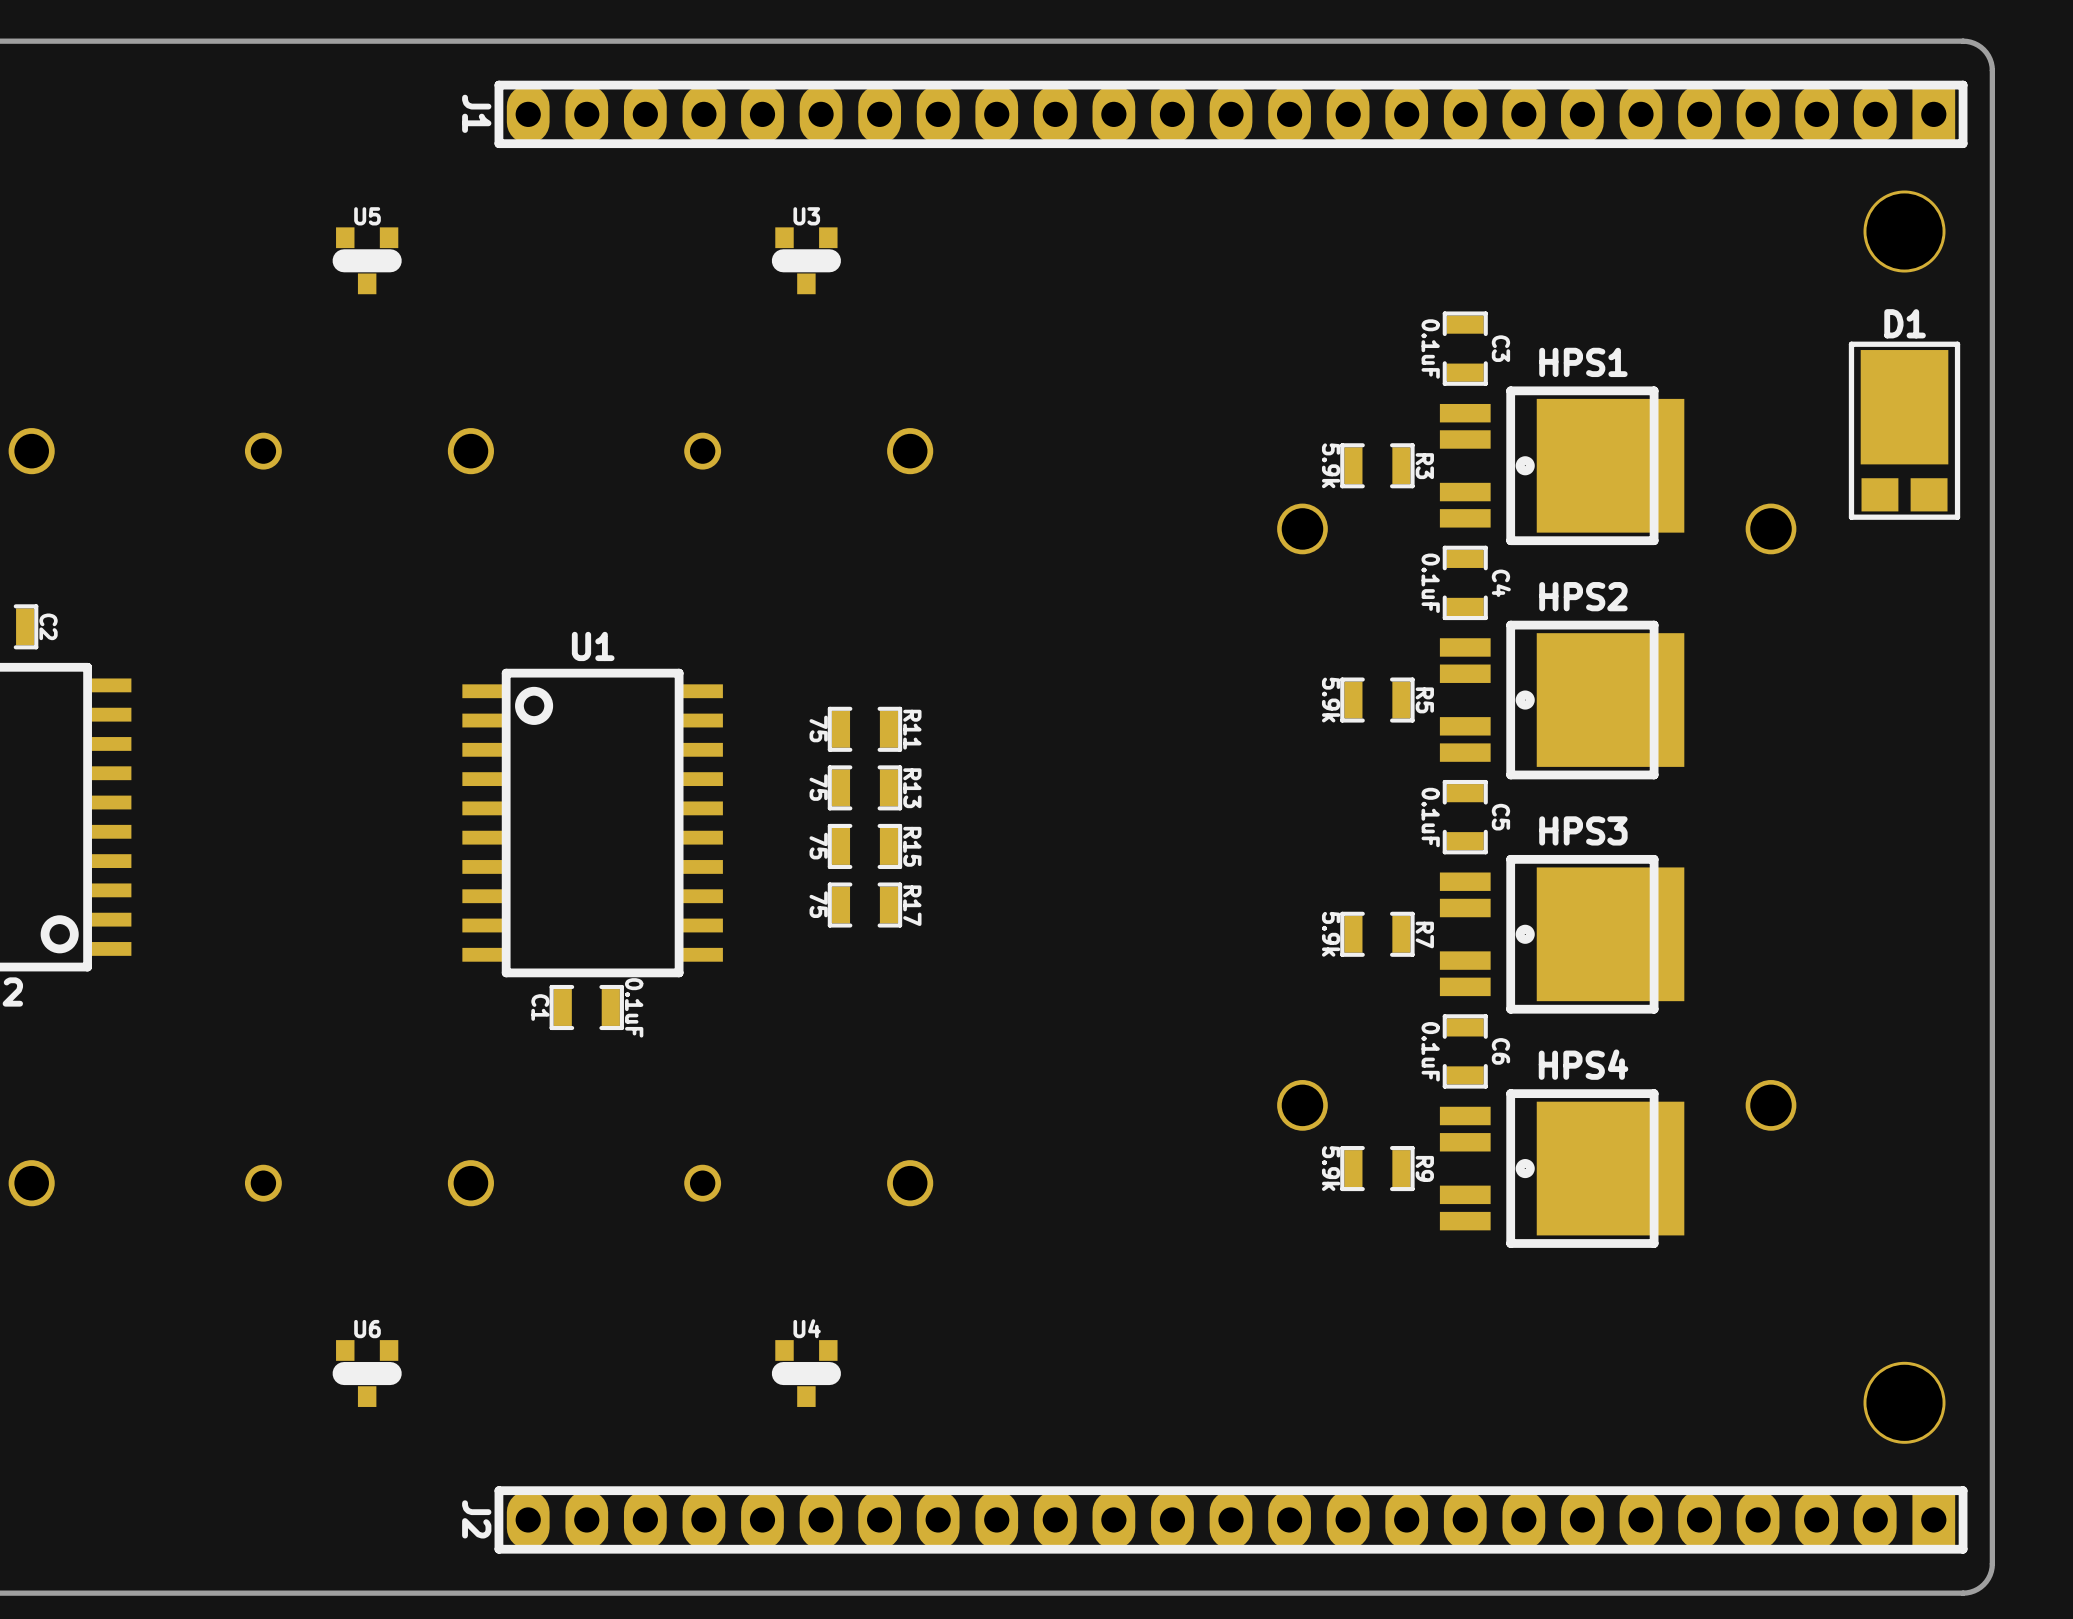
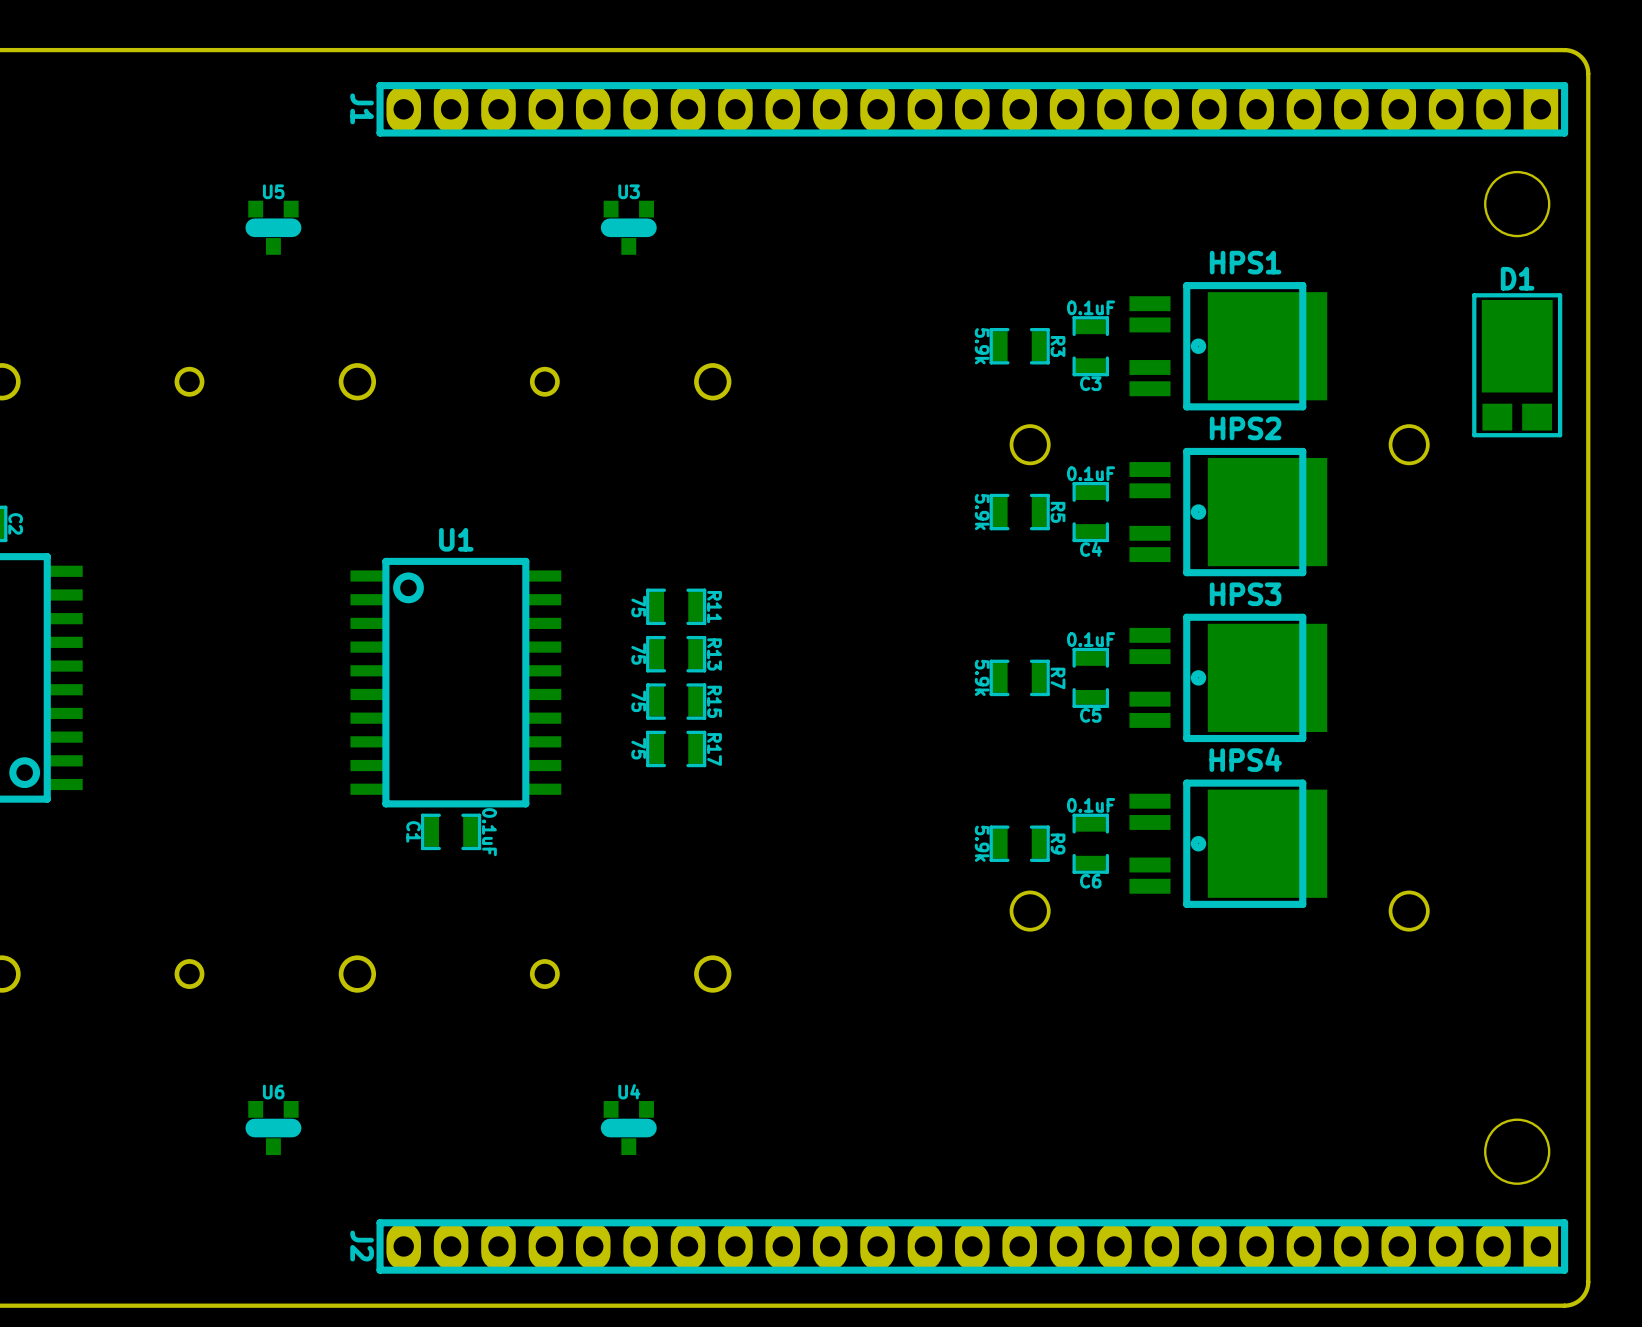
C3 value rotation: 0° (1430, 348) -> 90° counterclockwise (1091, 307)
C3 position: (1465, 348) -> (1090, 346)
C3 name rotation: 0° (1500, 348) -> 90° counterclockwise (1090, 383)
C3 name position: C3 (1500, 348) -> C3 (1090, 383)
R3 position: (1377, 465) -> (1019, 346)
HPS1 position: (1562, 465) -> (1228, 346)
C4 position: (1465, 582) -> (1090, 512)
C4 value rotation: 0° (1430, 583) -> 90° counterclockwise (1091, 473)
C4 name rotation: 0° (1501, 583) -> 90° counterclockwise (1091, 549)
C4 name position: C4 (1501, 583) -> C4 (1091, 549)
R5 position: (1377, 700) -> (1019, 512)
HPS2 position: (1562, 700) -> (1228, 512)
C5 value rotation: 0° (1430, 817) -> 90° counterclockwise (1091, 639)
C5 position: (1465, 817) -> (1090, 677)
C5 name rotation: 0° (1500, 817) -> 90° counterclockwise (1090, 715)
C5 name position: C5 (1500, 817) -> C5 (1090, 715)
R7 position: (1377, 934) -> (1019, 677)
HPS3 position: (1562, 934) -> (1228, 677)
C6 value rotation: 0° (1430, 1051) -> 90° counterclockwise (1091, 805)
C6 position: (1465, 1051) -> (1090, 843)
C6 name rotation: 0° (1500, 1051) -> 90° counterclockwise (1090, 881)
C6 name position: C6 (1500, 1051) -> C6 (1090, 881)
R9 position: (1377, 1168) -> (1019, 843)
HPS4 position: (1562, 1168) -> (1228, 843)

